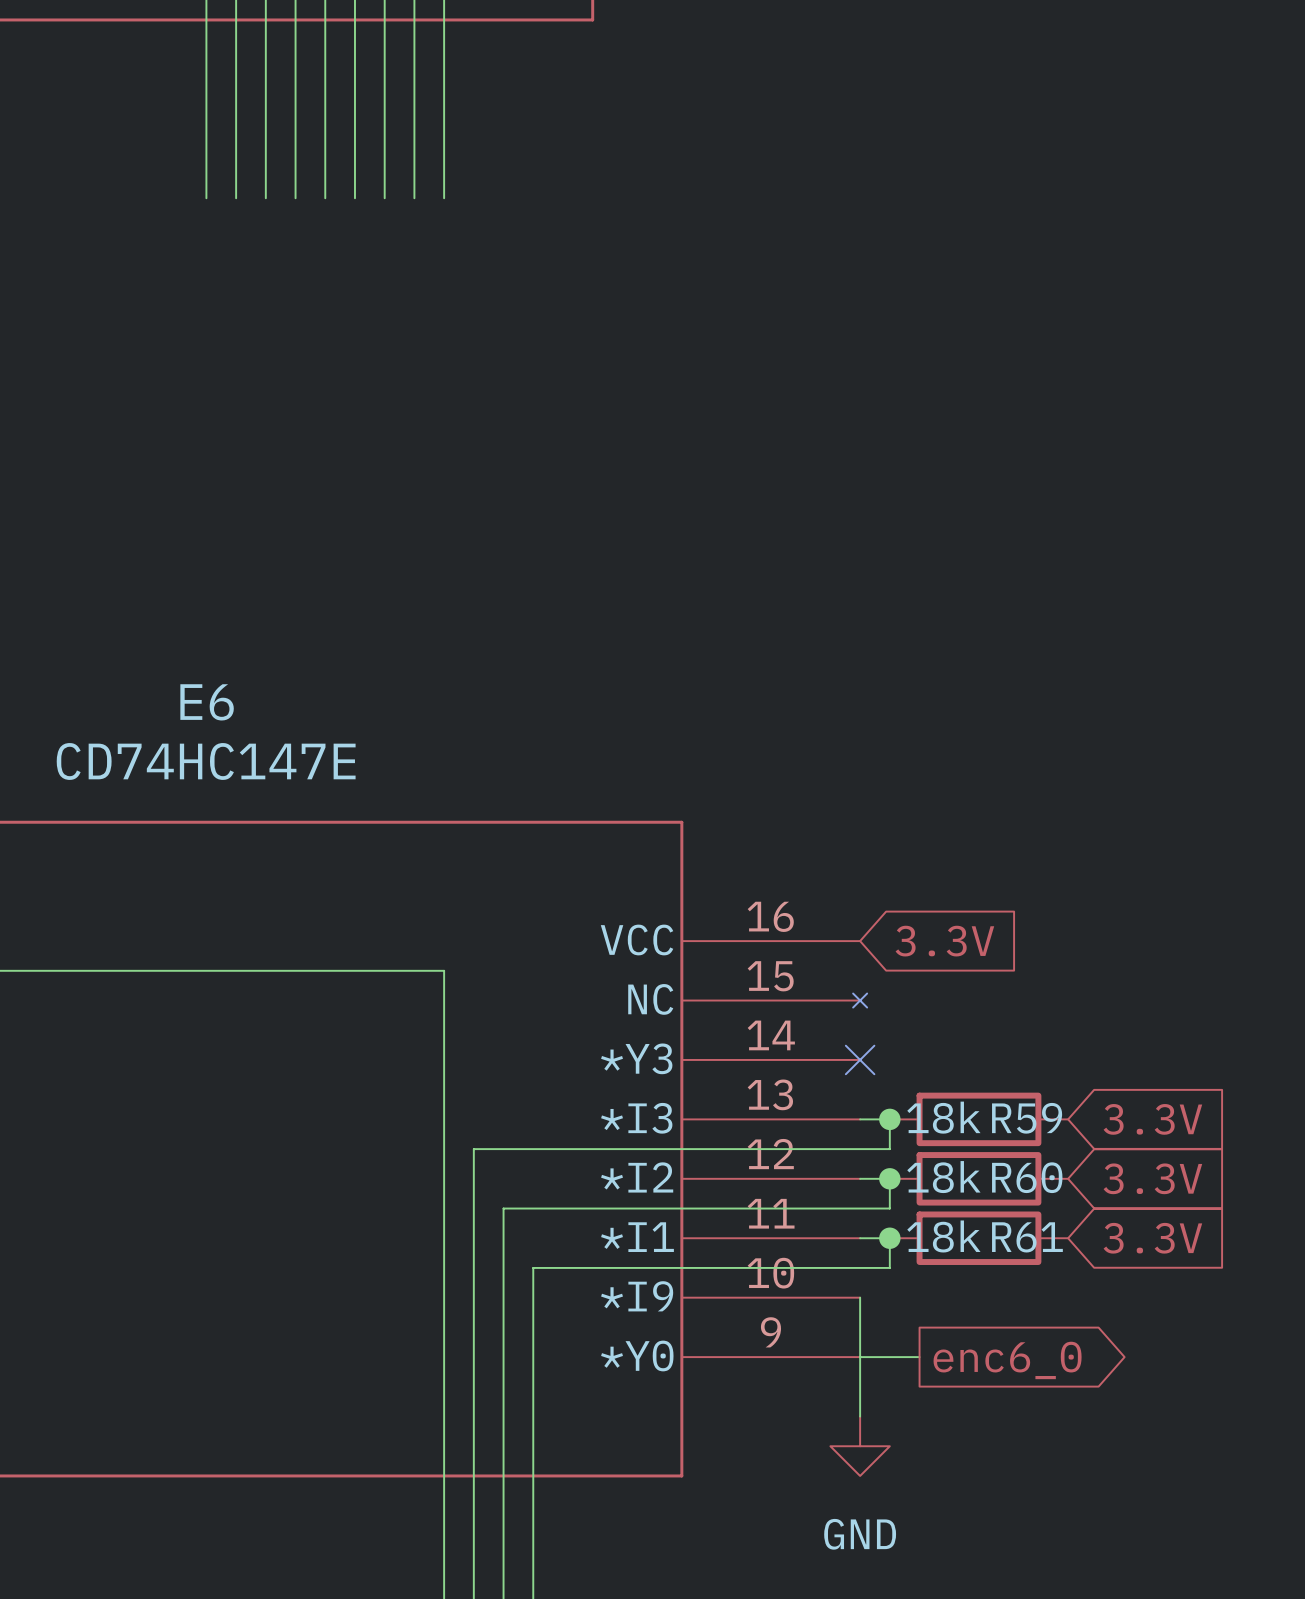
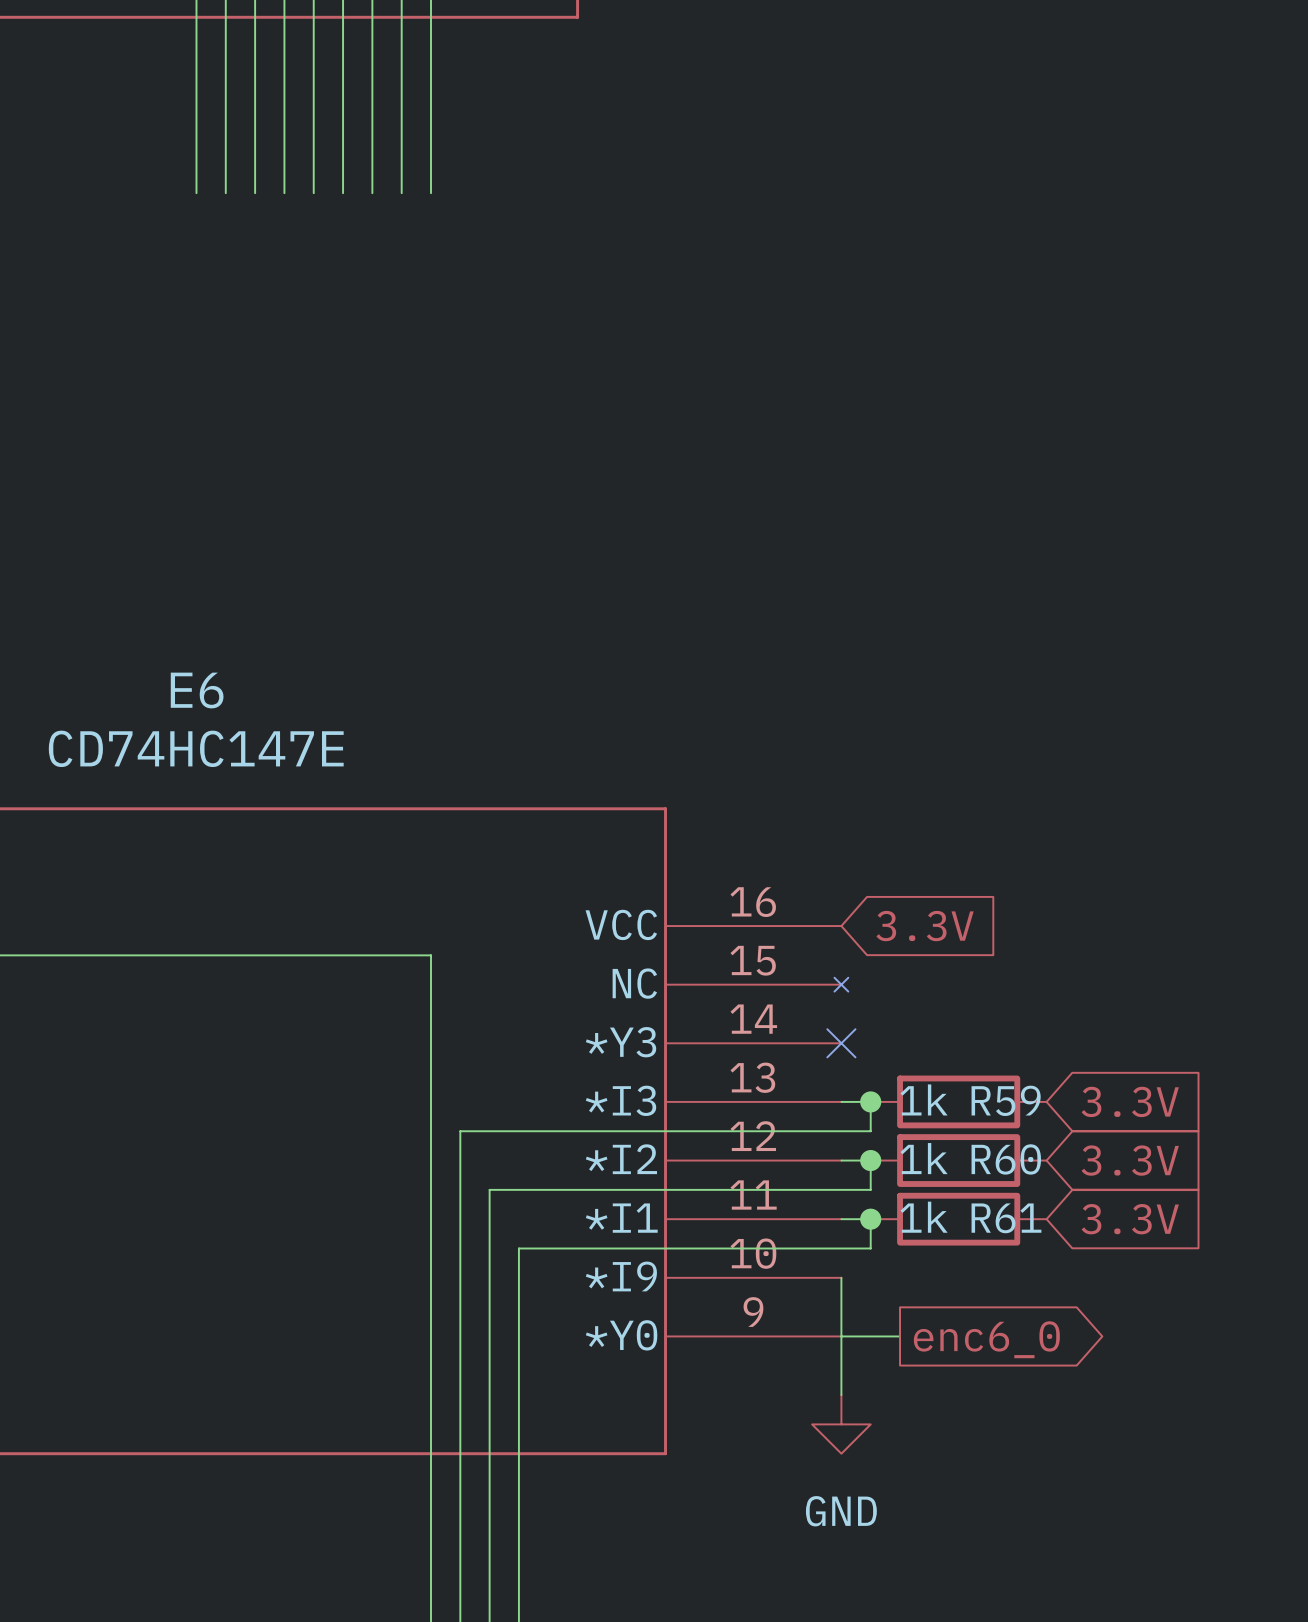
R59 value: 18k (943, 1117) -> 1k (924, 1099)
R60 value: 18k (943, 1177) -> 1k (924, 1158)
R61 value: 18k (943, 1236) -> 1k (924, 1217)

